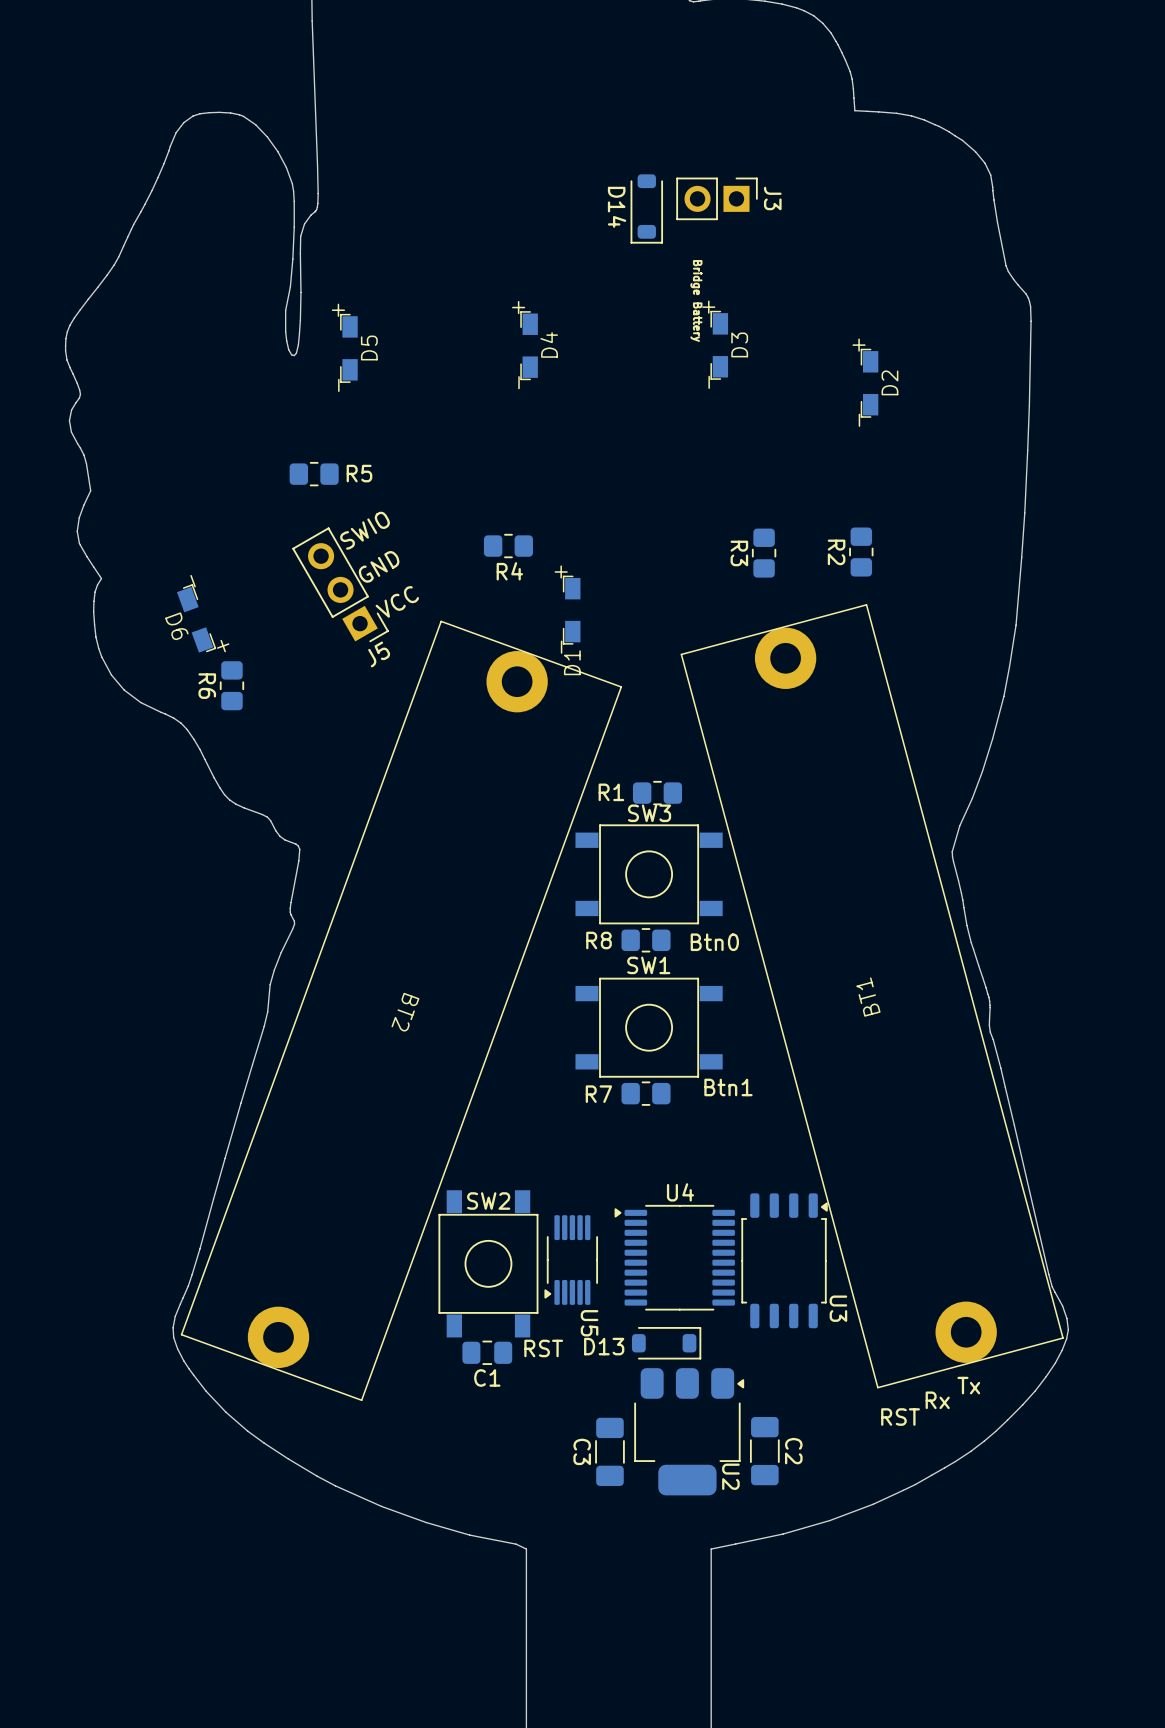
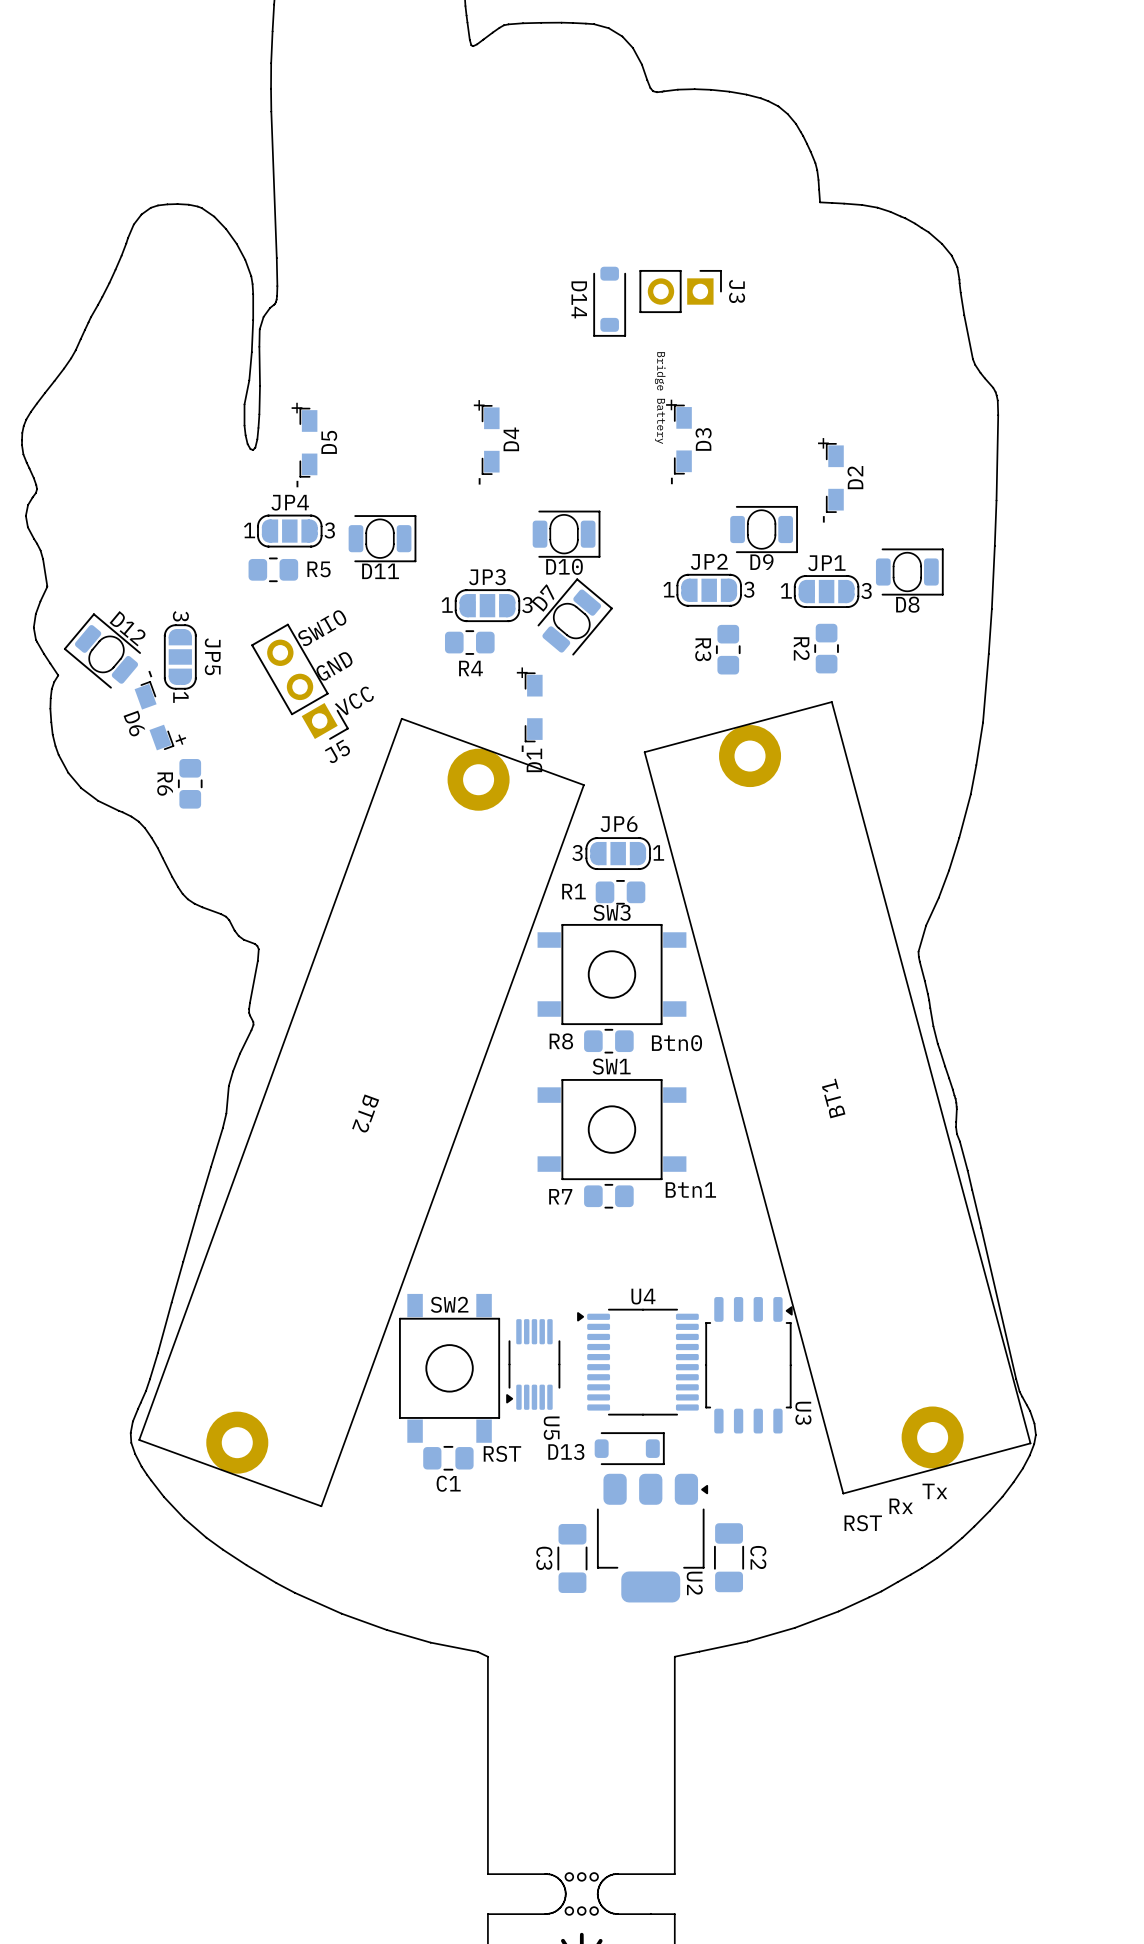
D9: none -> (764, 529)
JP4: none -> (289, 531)
D10: none -> (566, 534)
D11: none -> (382, 538)
D8: none -> (909, 572)
JP2: none -> (709, 590)
JP1: none -> (826, 591)
JP3: none -> (487, 605)
D7: none -> (575, 616)
D12: none -> (102, 650)
JP5: none -> (180, 656)
JP6: none -> (618, 853)

